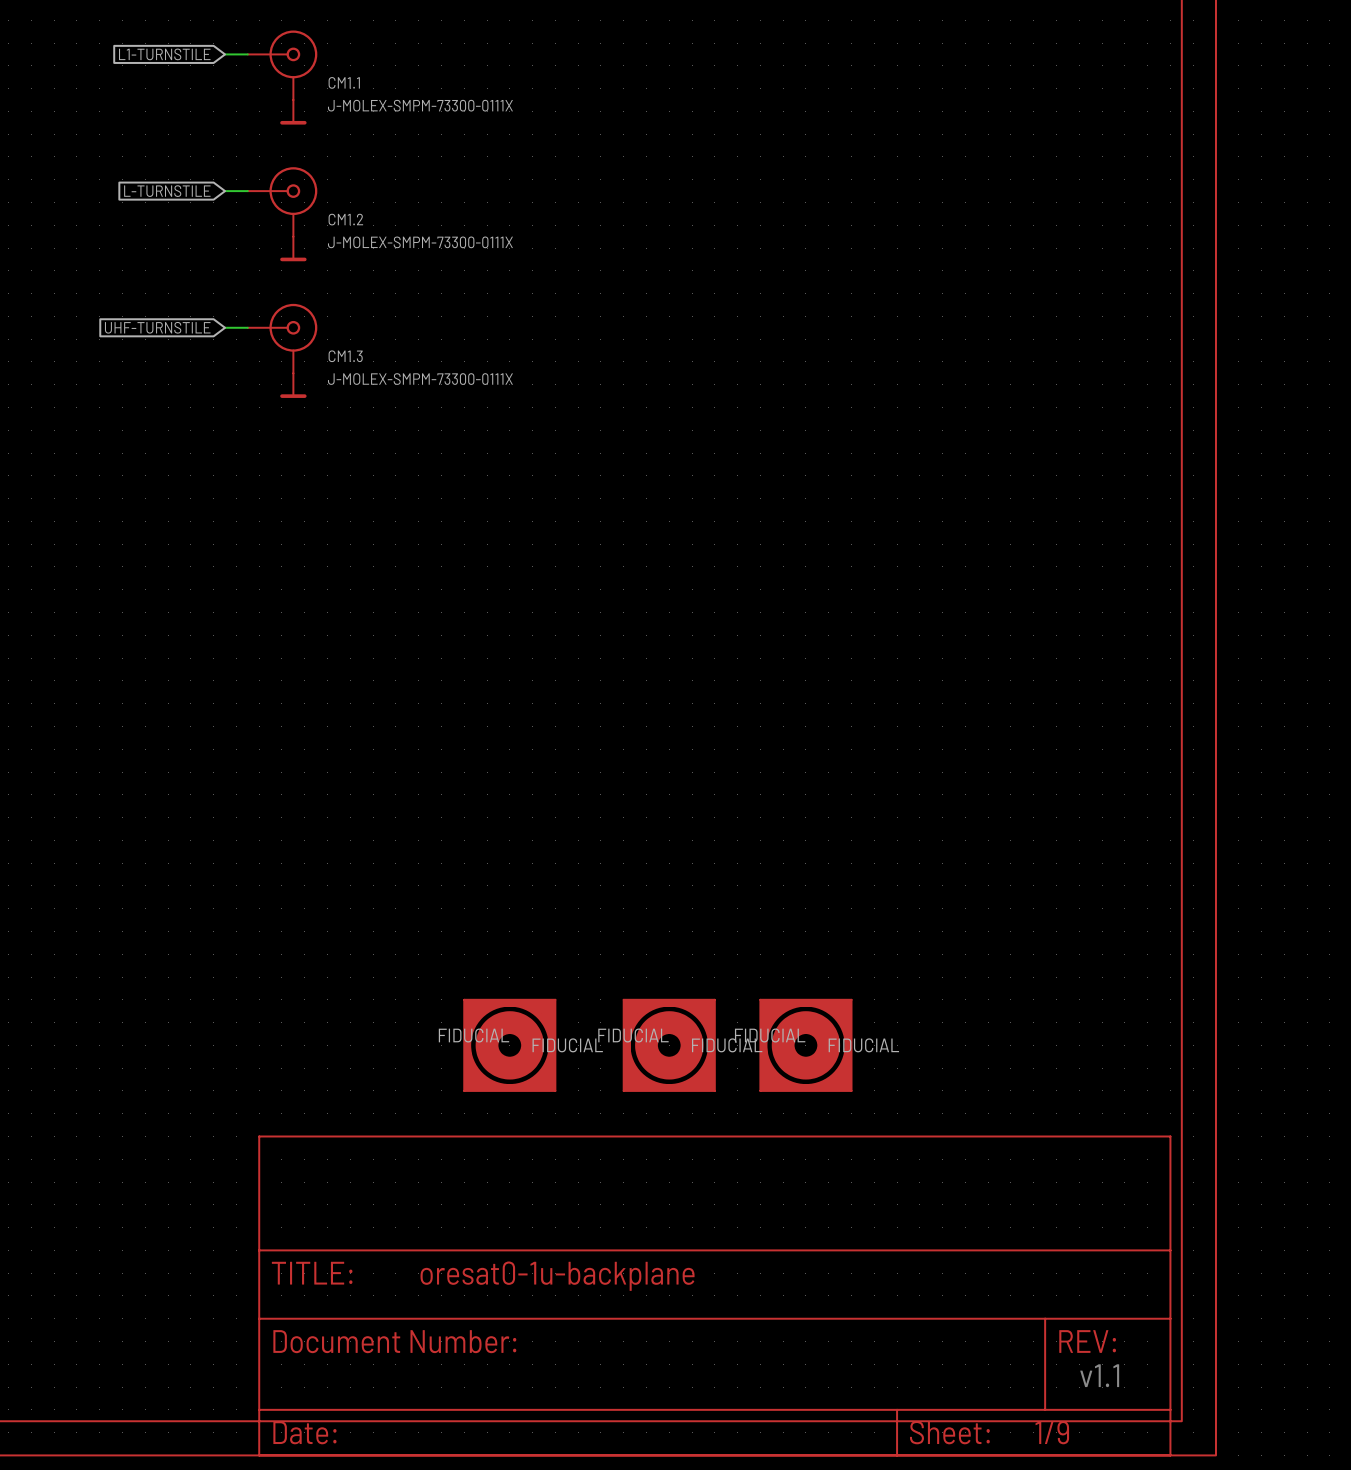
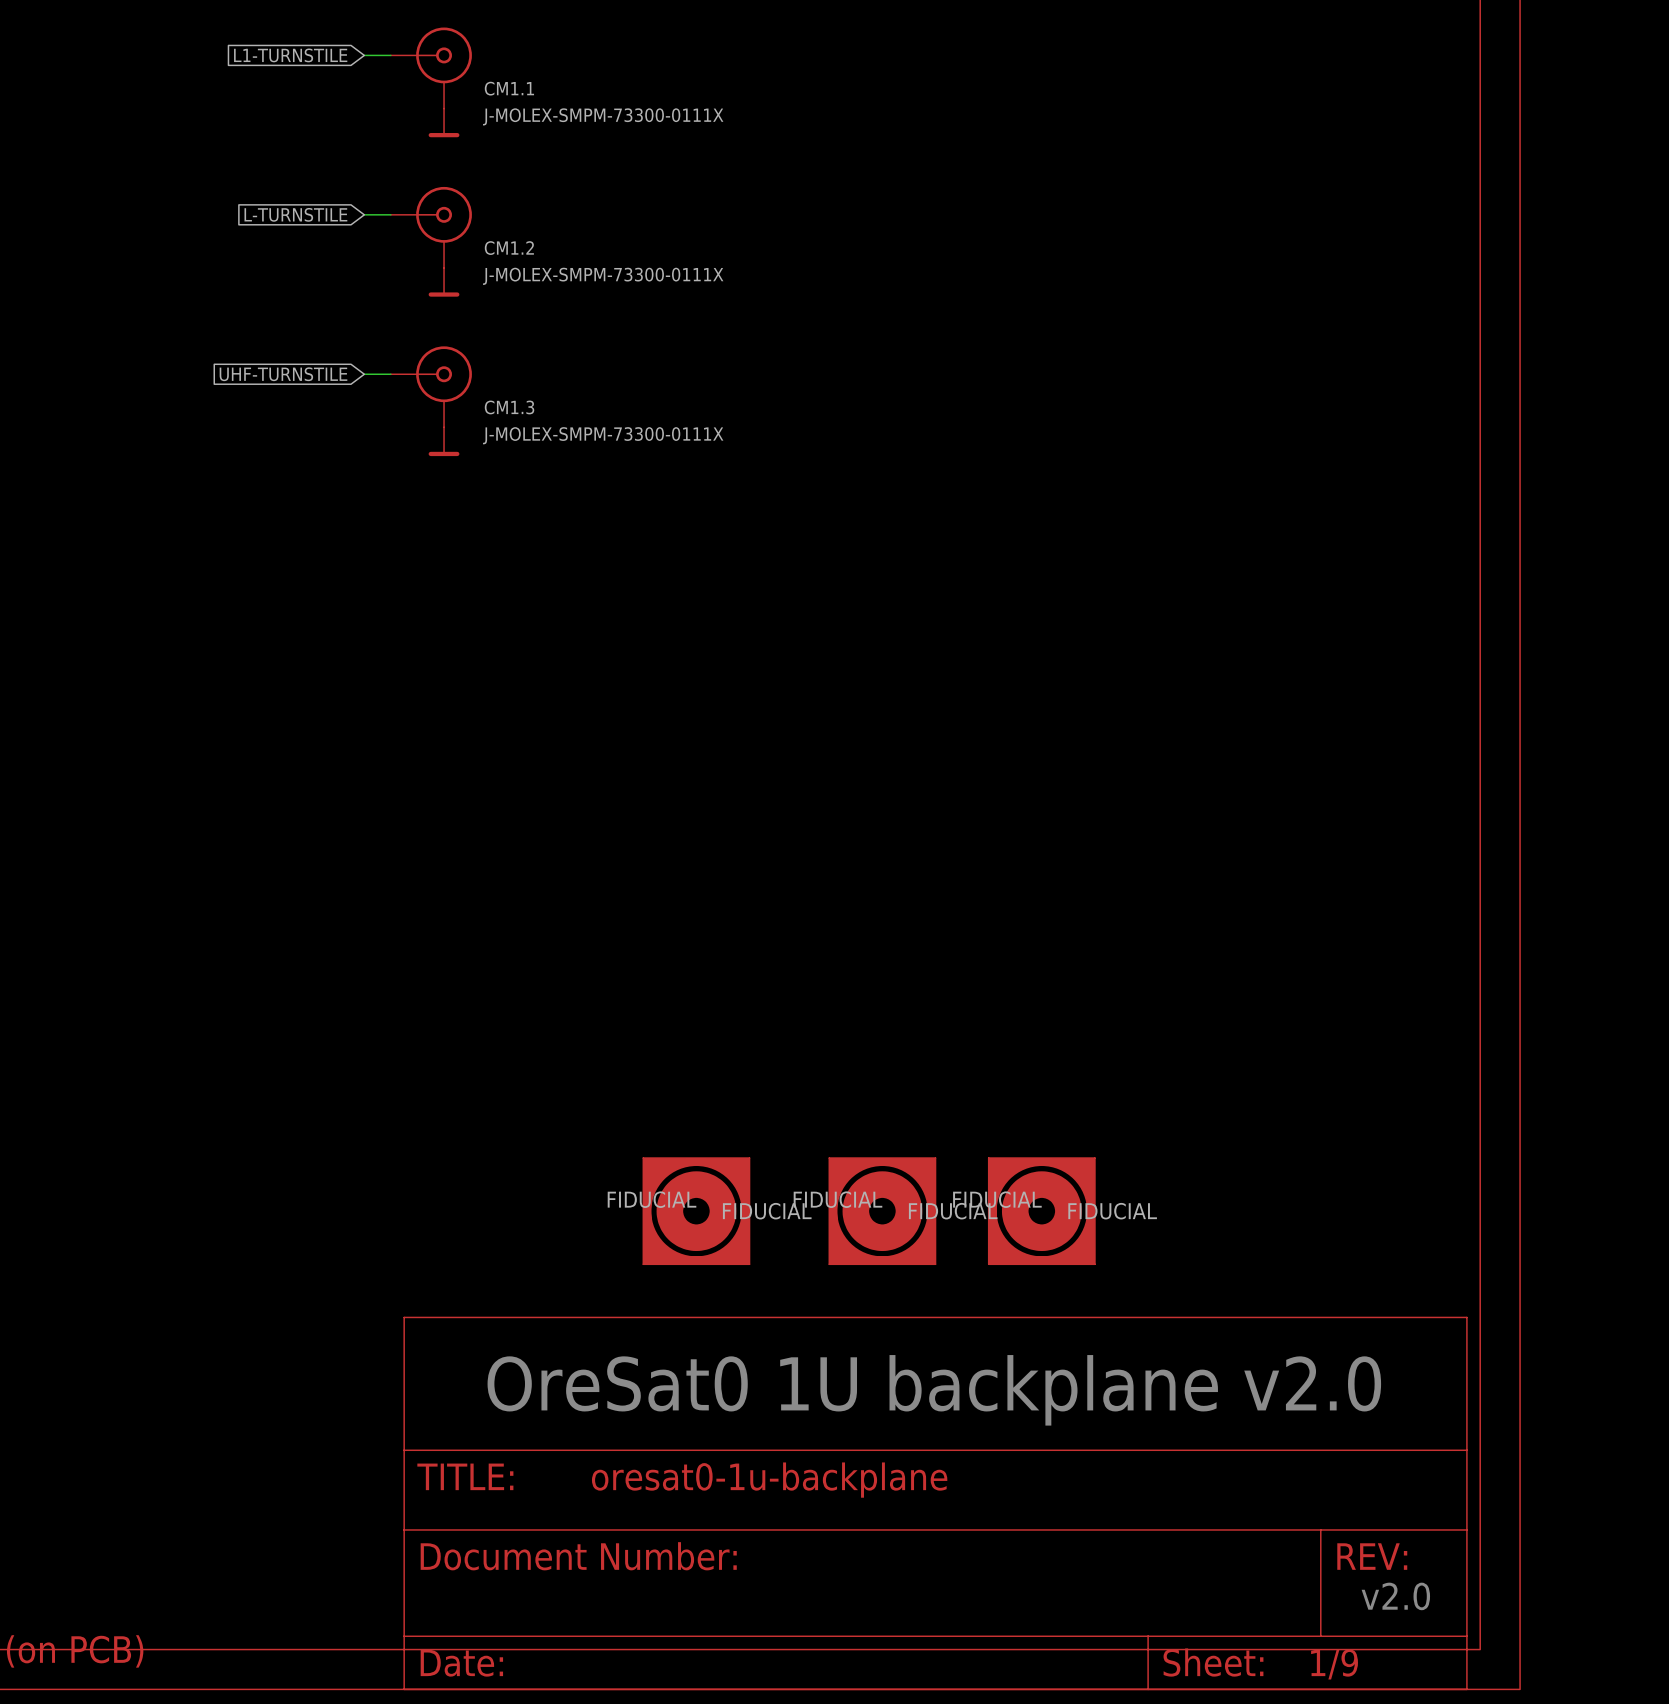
text: none -> OreSat0 1U backplane v2.0 (934, 1390)
text: v1.1 (1099, 1375) -> v2.0 (1395, 1596)

